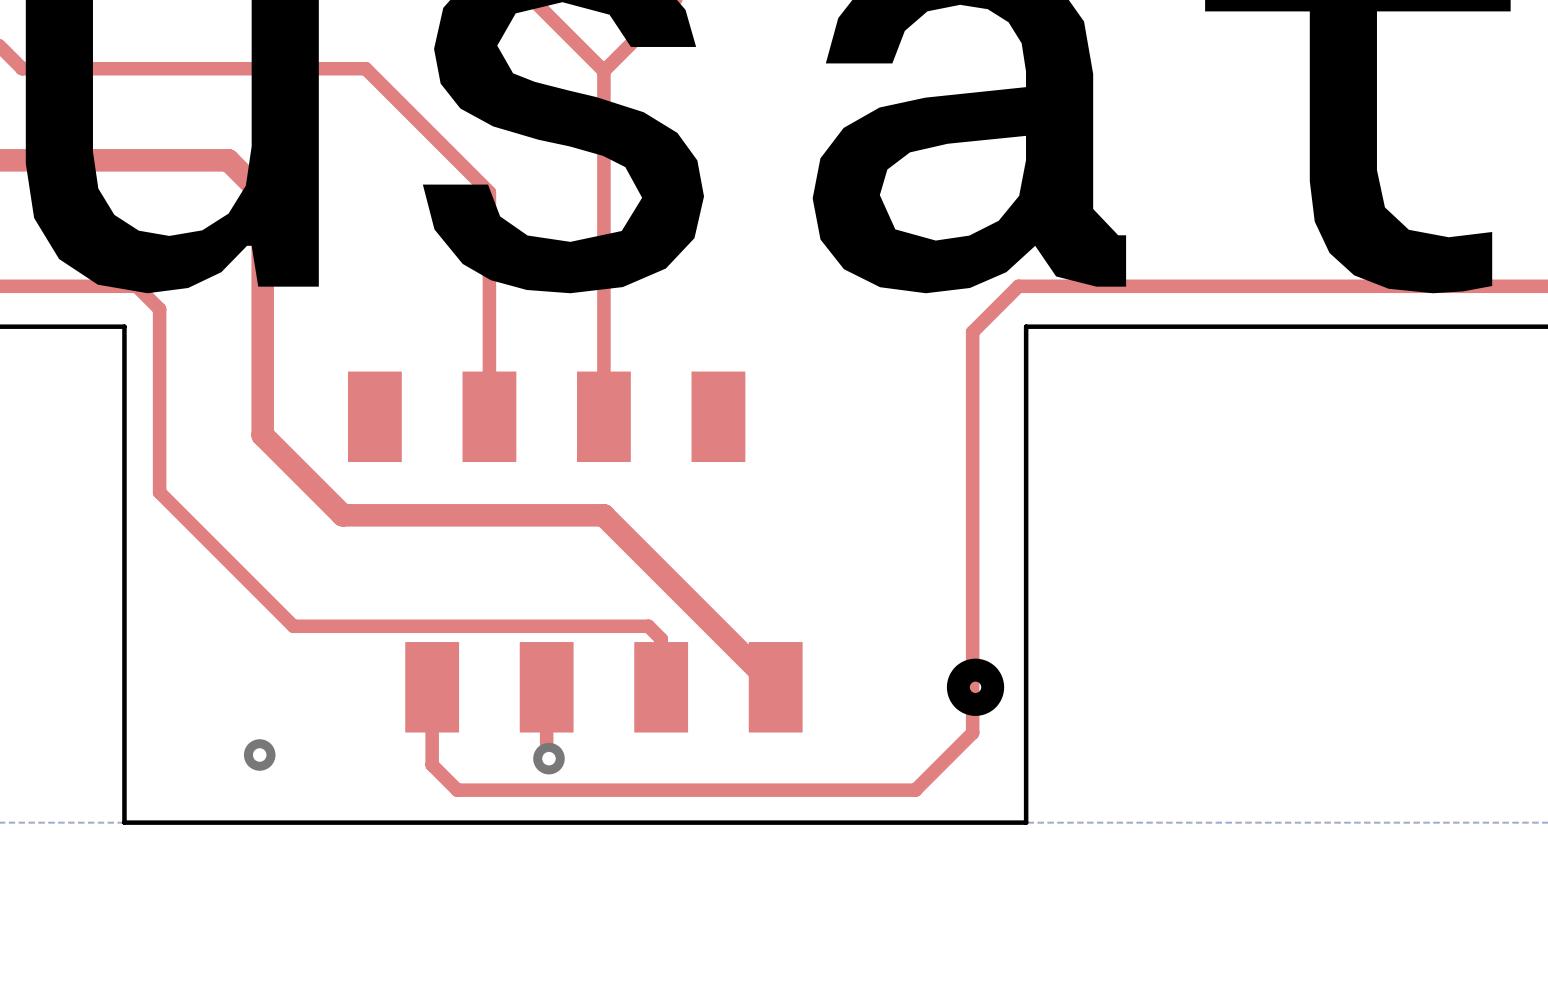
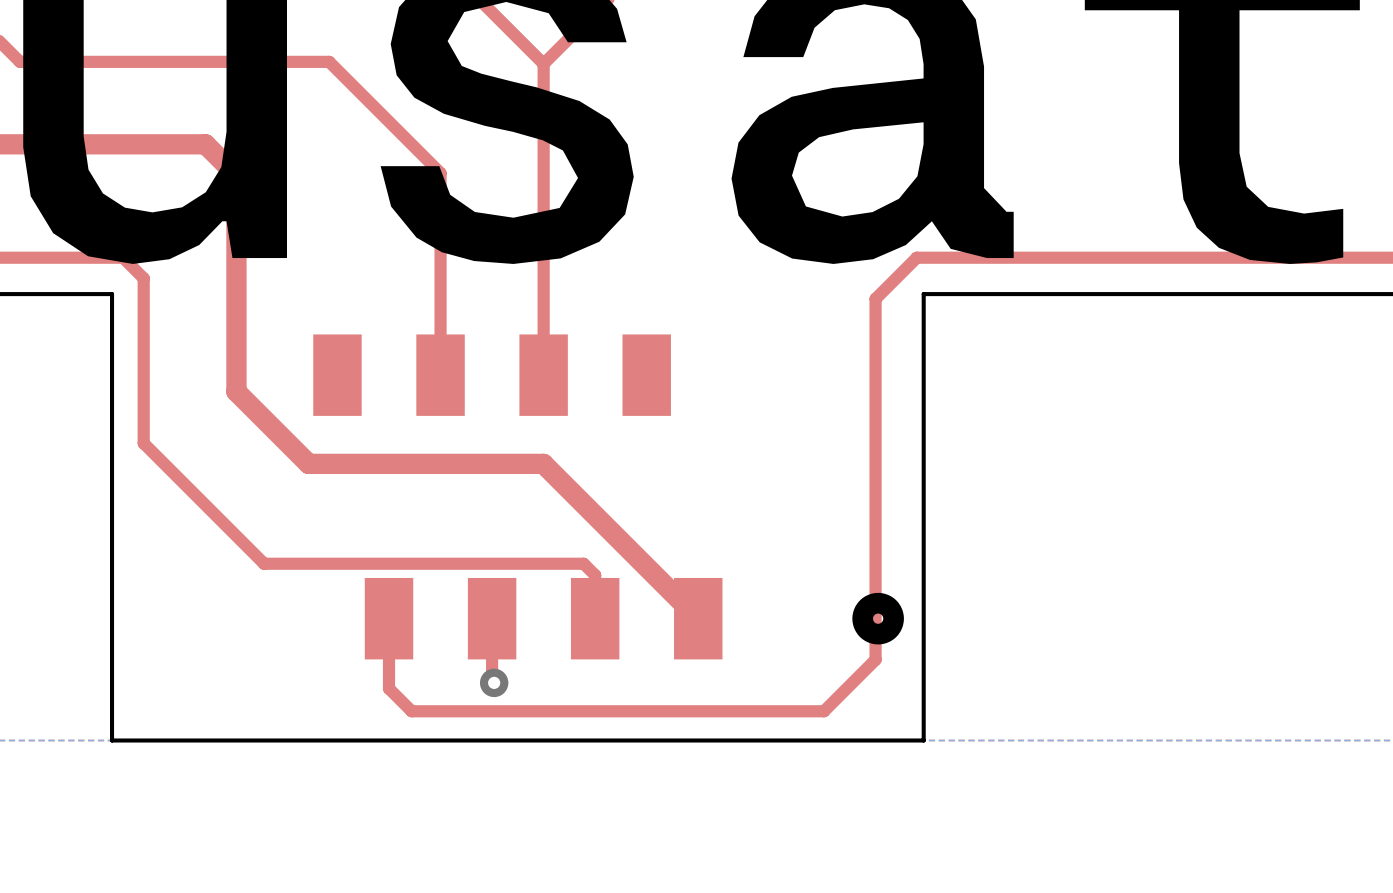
via: (259, 754) -> none

